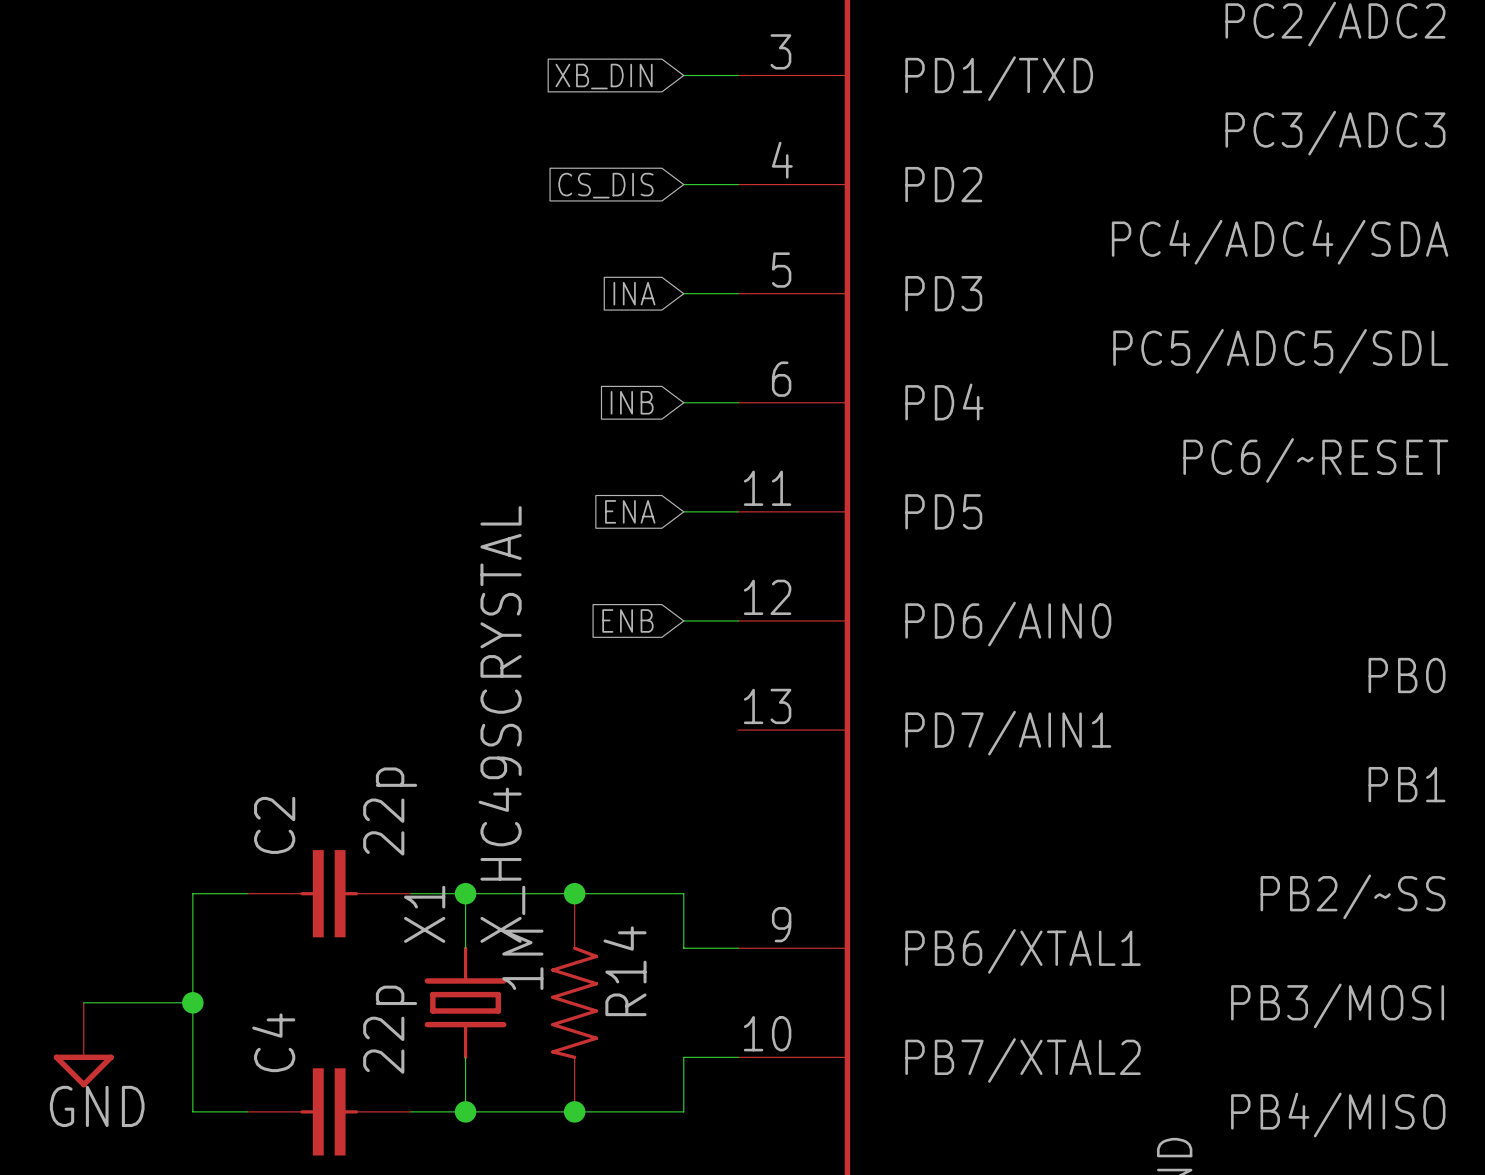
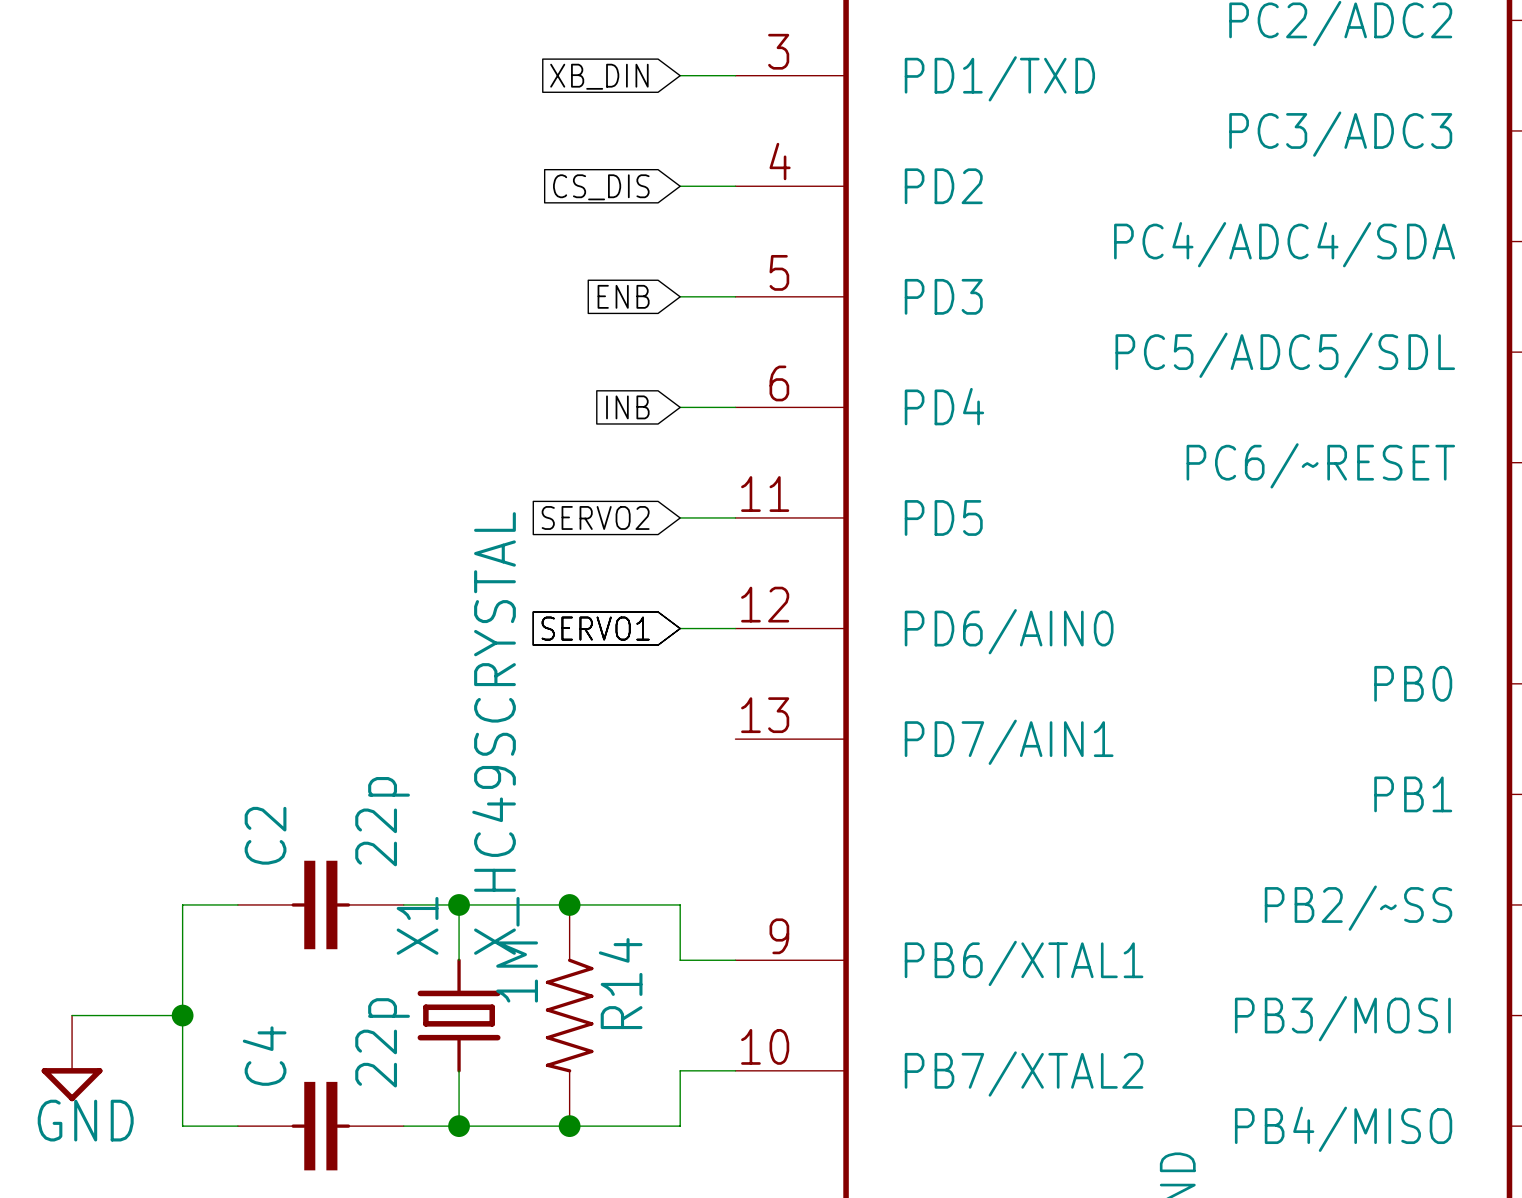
global label: INA (634, 293) -> ENB (623, 296)
global label: ENA (630, 511) -> SERVO2 (595, 517)
global label: ENB (627, 620) -> SERVO1 (595, 628)

